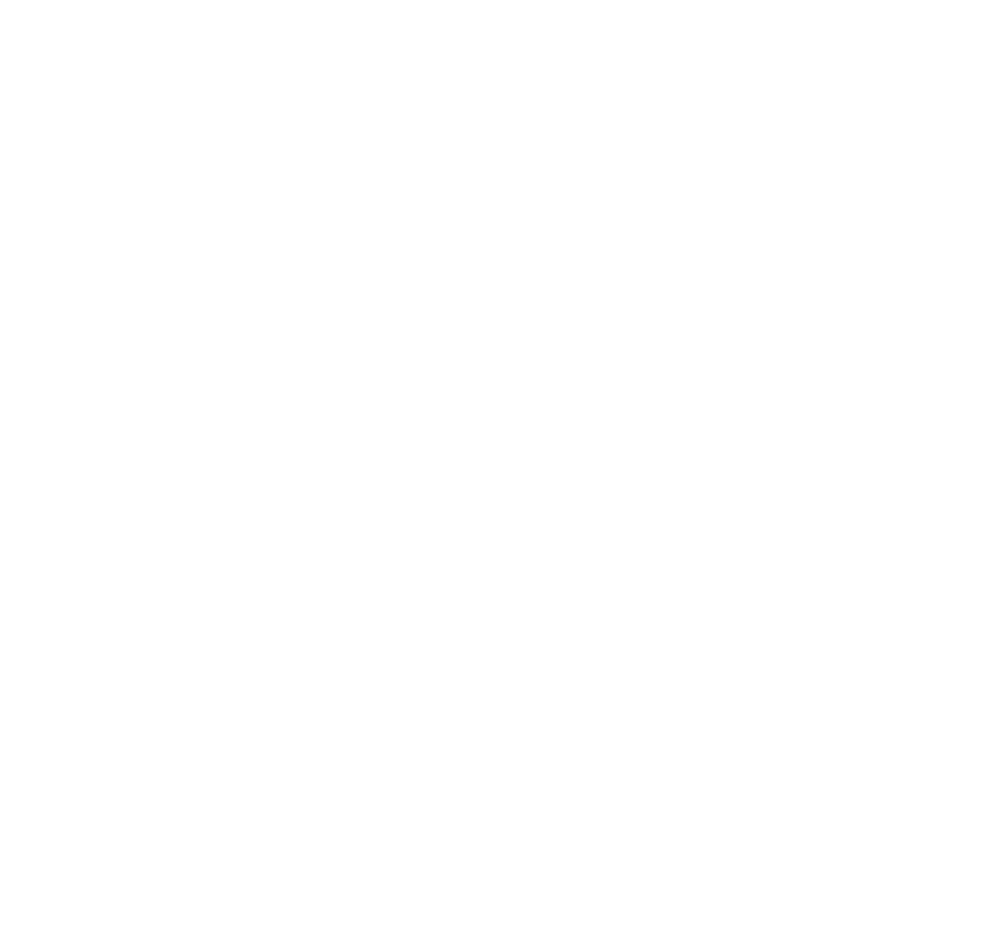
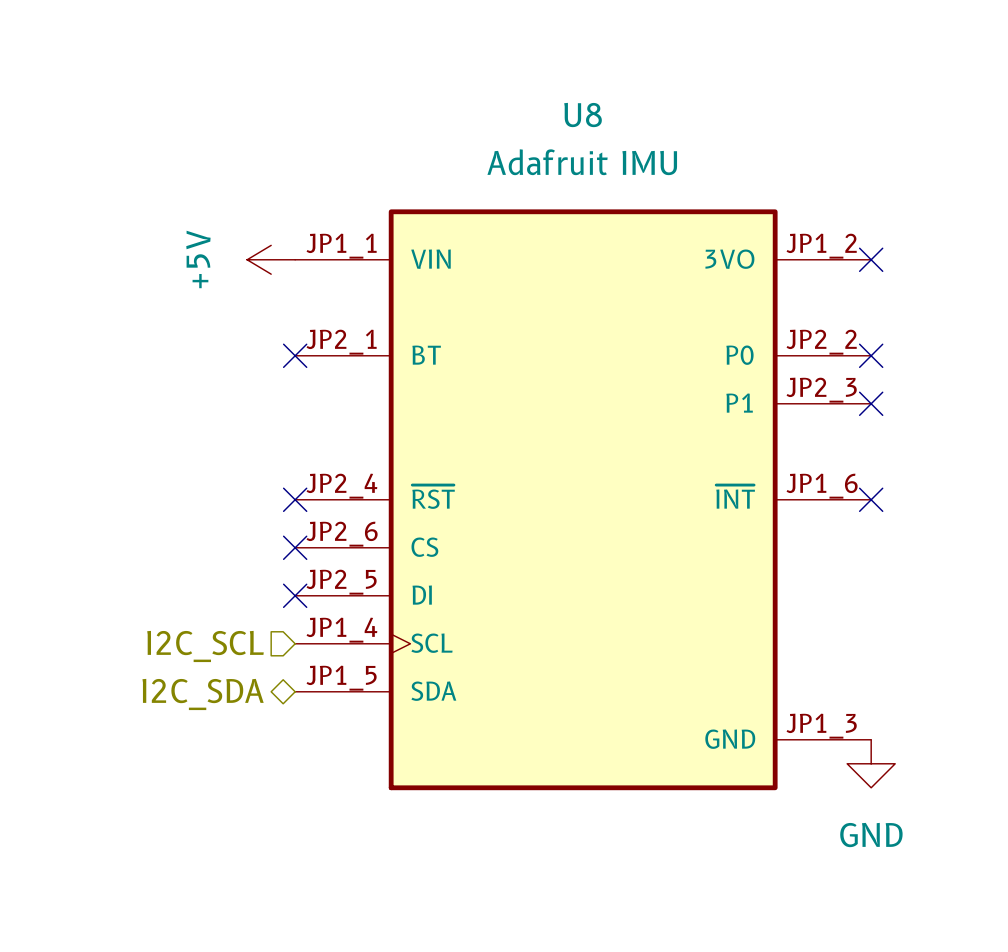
power symbol: none -> +5V (271, 259)
no-connect mark: none -> (871, 259)
no-connect mark: none -> (295, 355)
no-connect mark: none -> (871, 355)
no-connect mark: none -> (871, 403)
no-connect mark: none -> (295, 499)
U8: none -> Adafruit IMU (583, 499)
no-connect mark: none -> (871, 499)
no-connect mark: none -> (295, 547)
no-connect mark: none -> (295, 595)
hierarchical label: none -> I2C_SCL (205, 646)
hierarchical label: none -> I2C_SDA (203, 694)
power symbol: none -> GND (871, 763)

